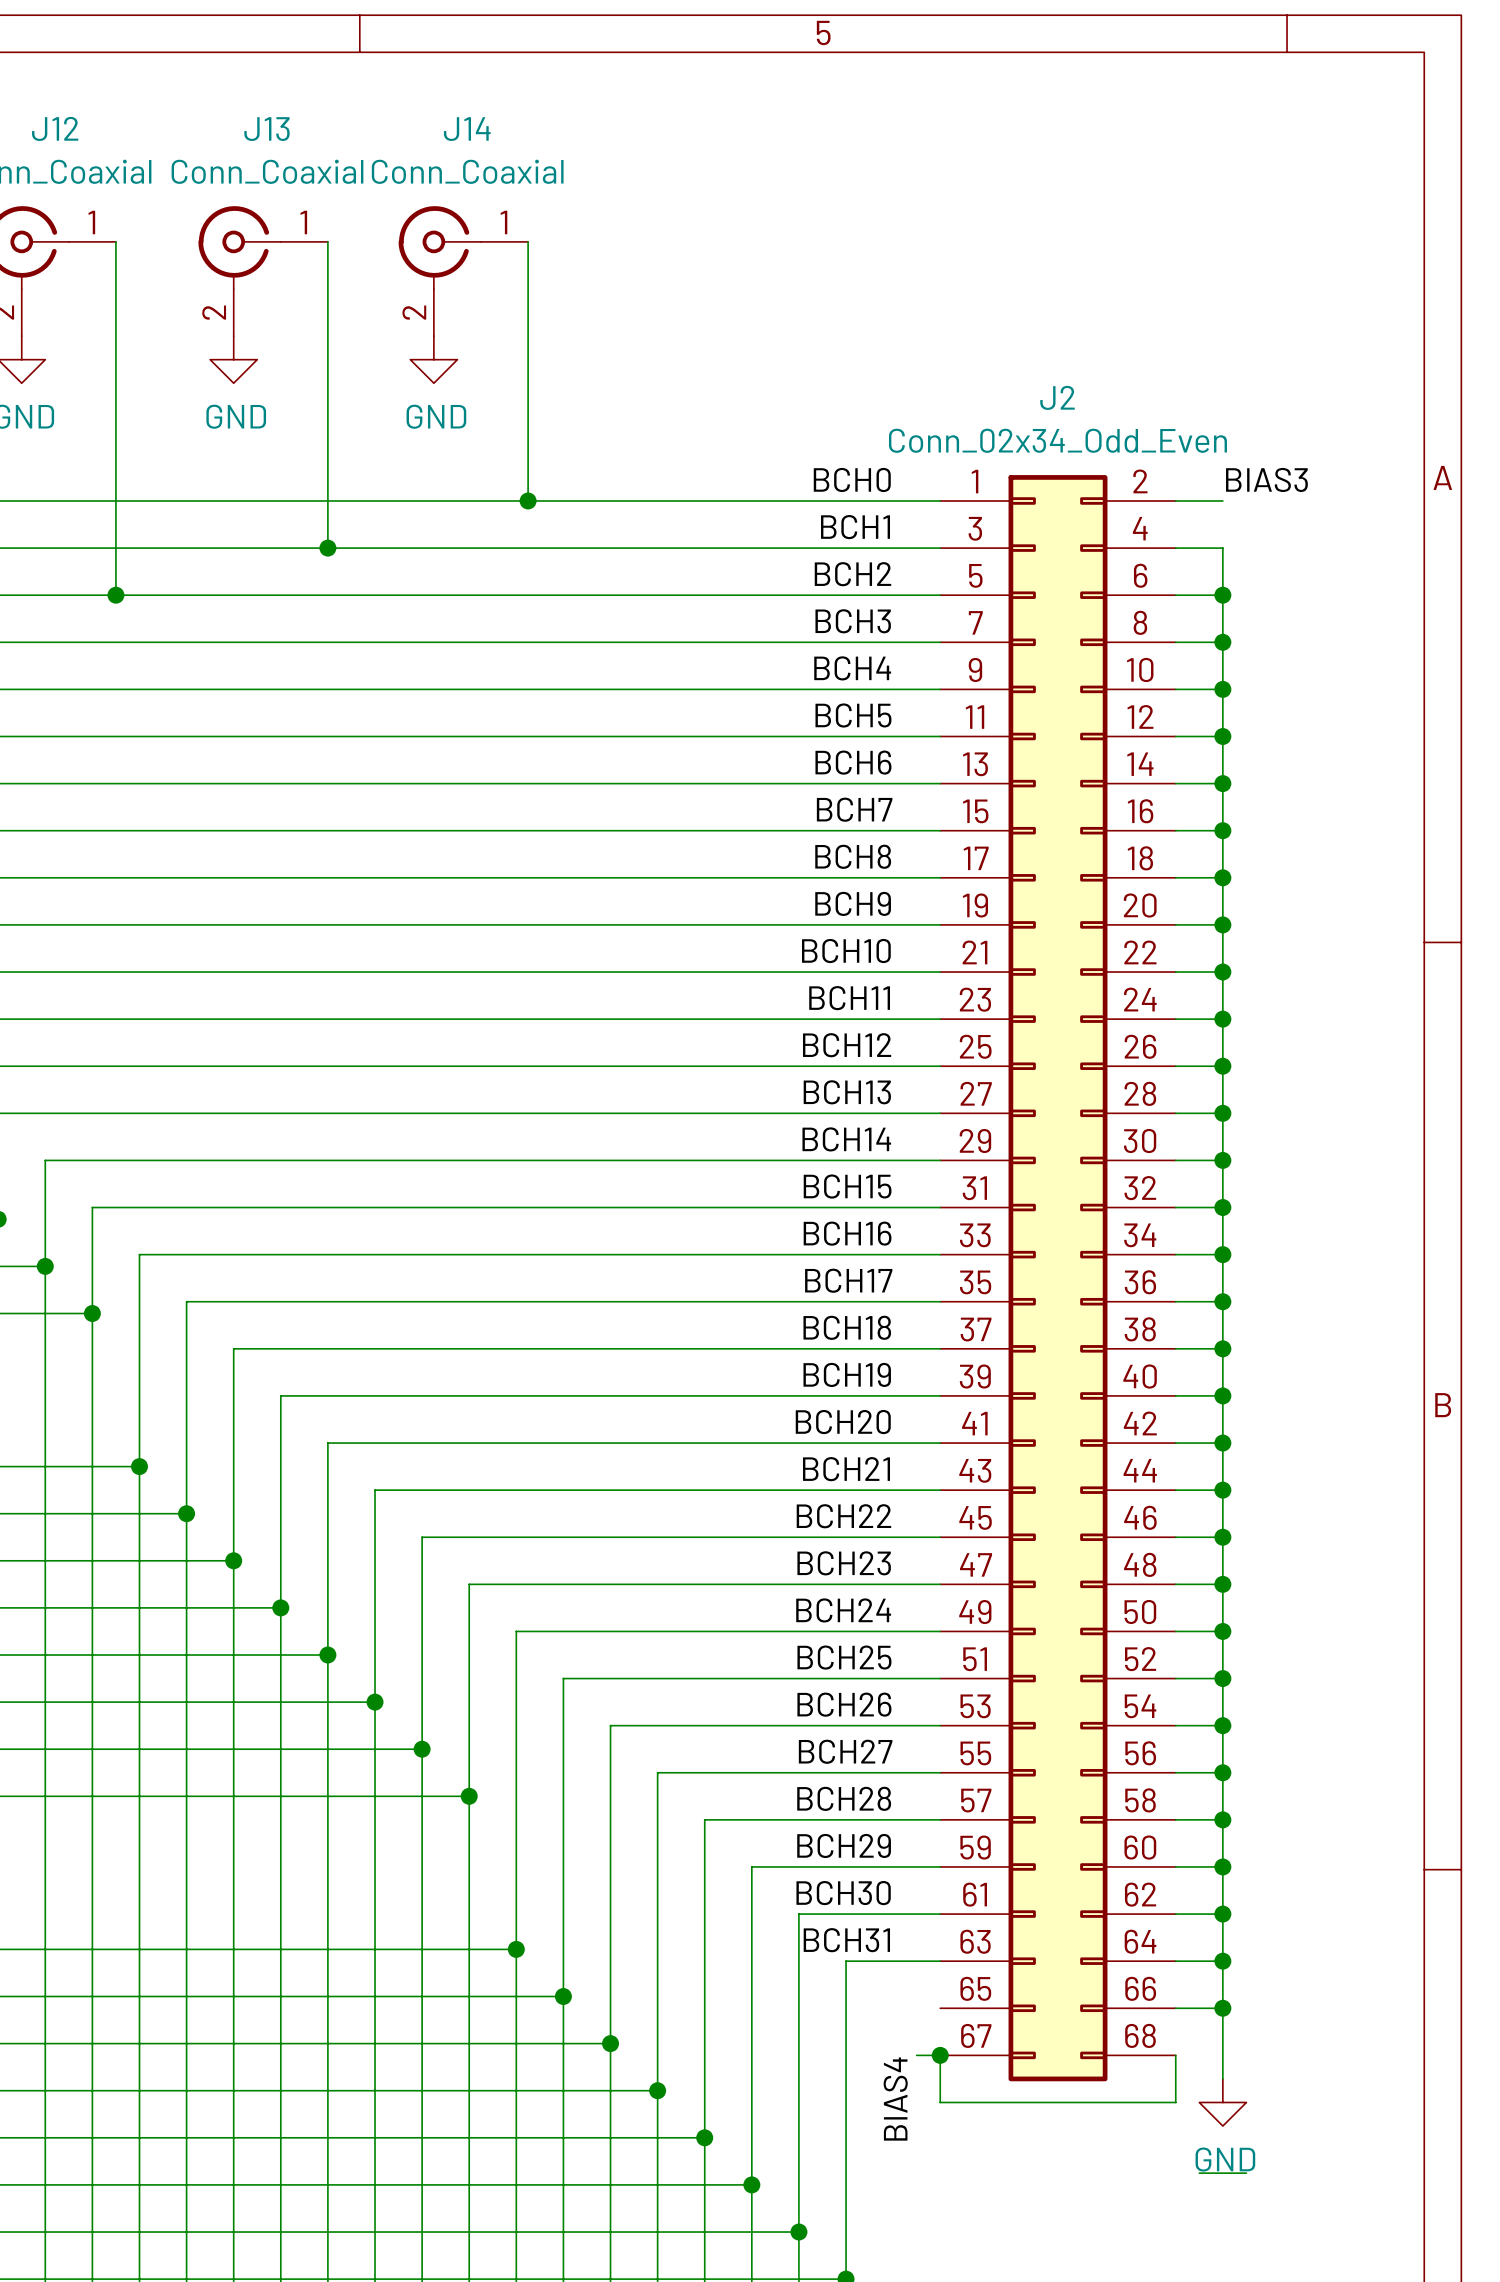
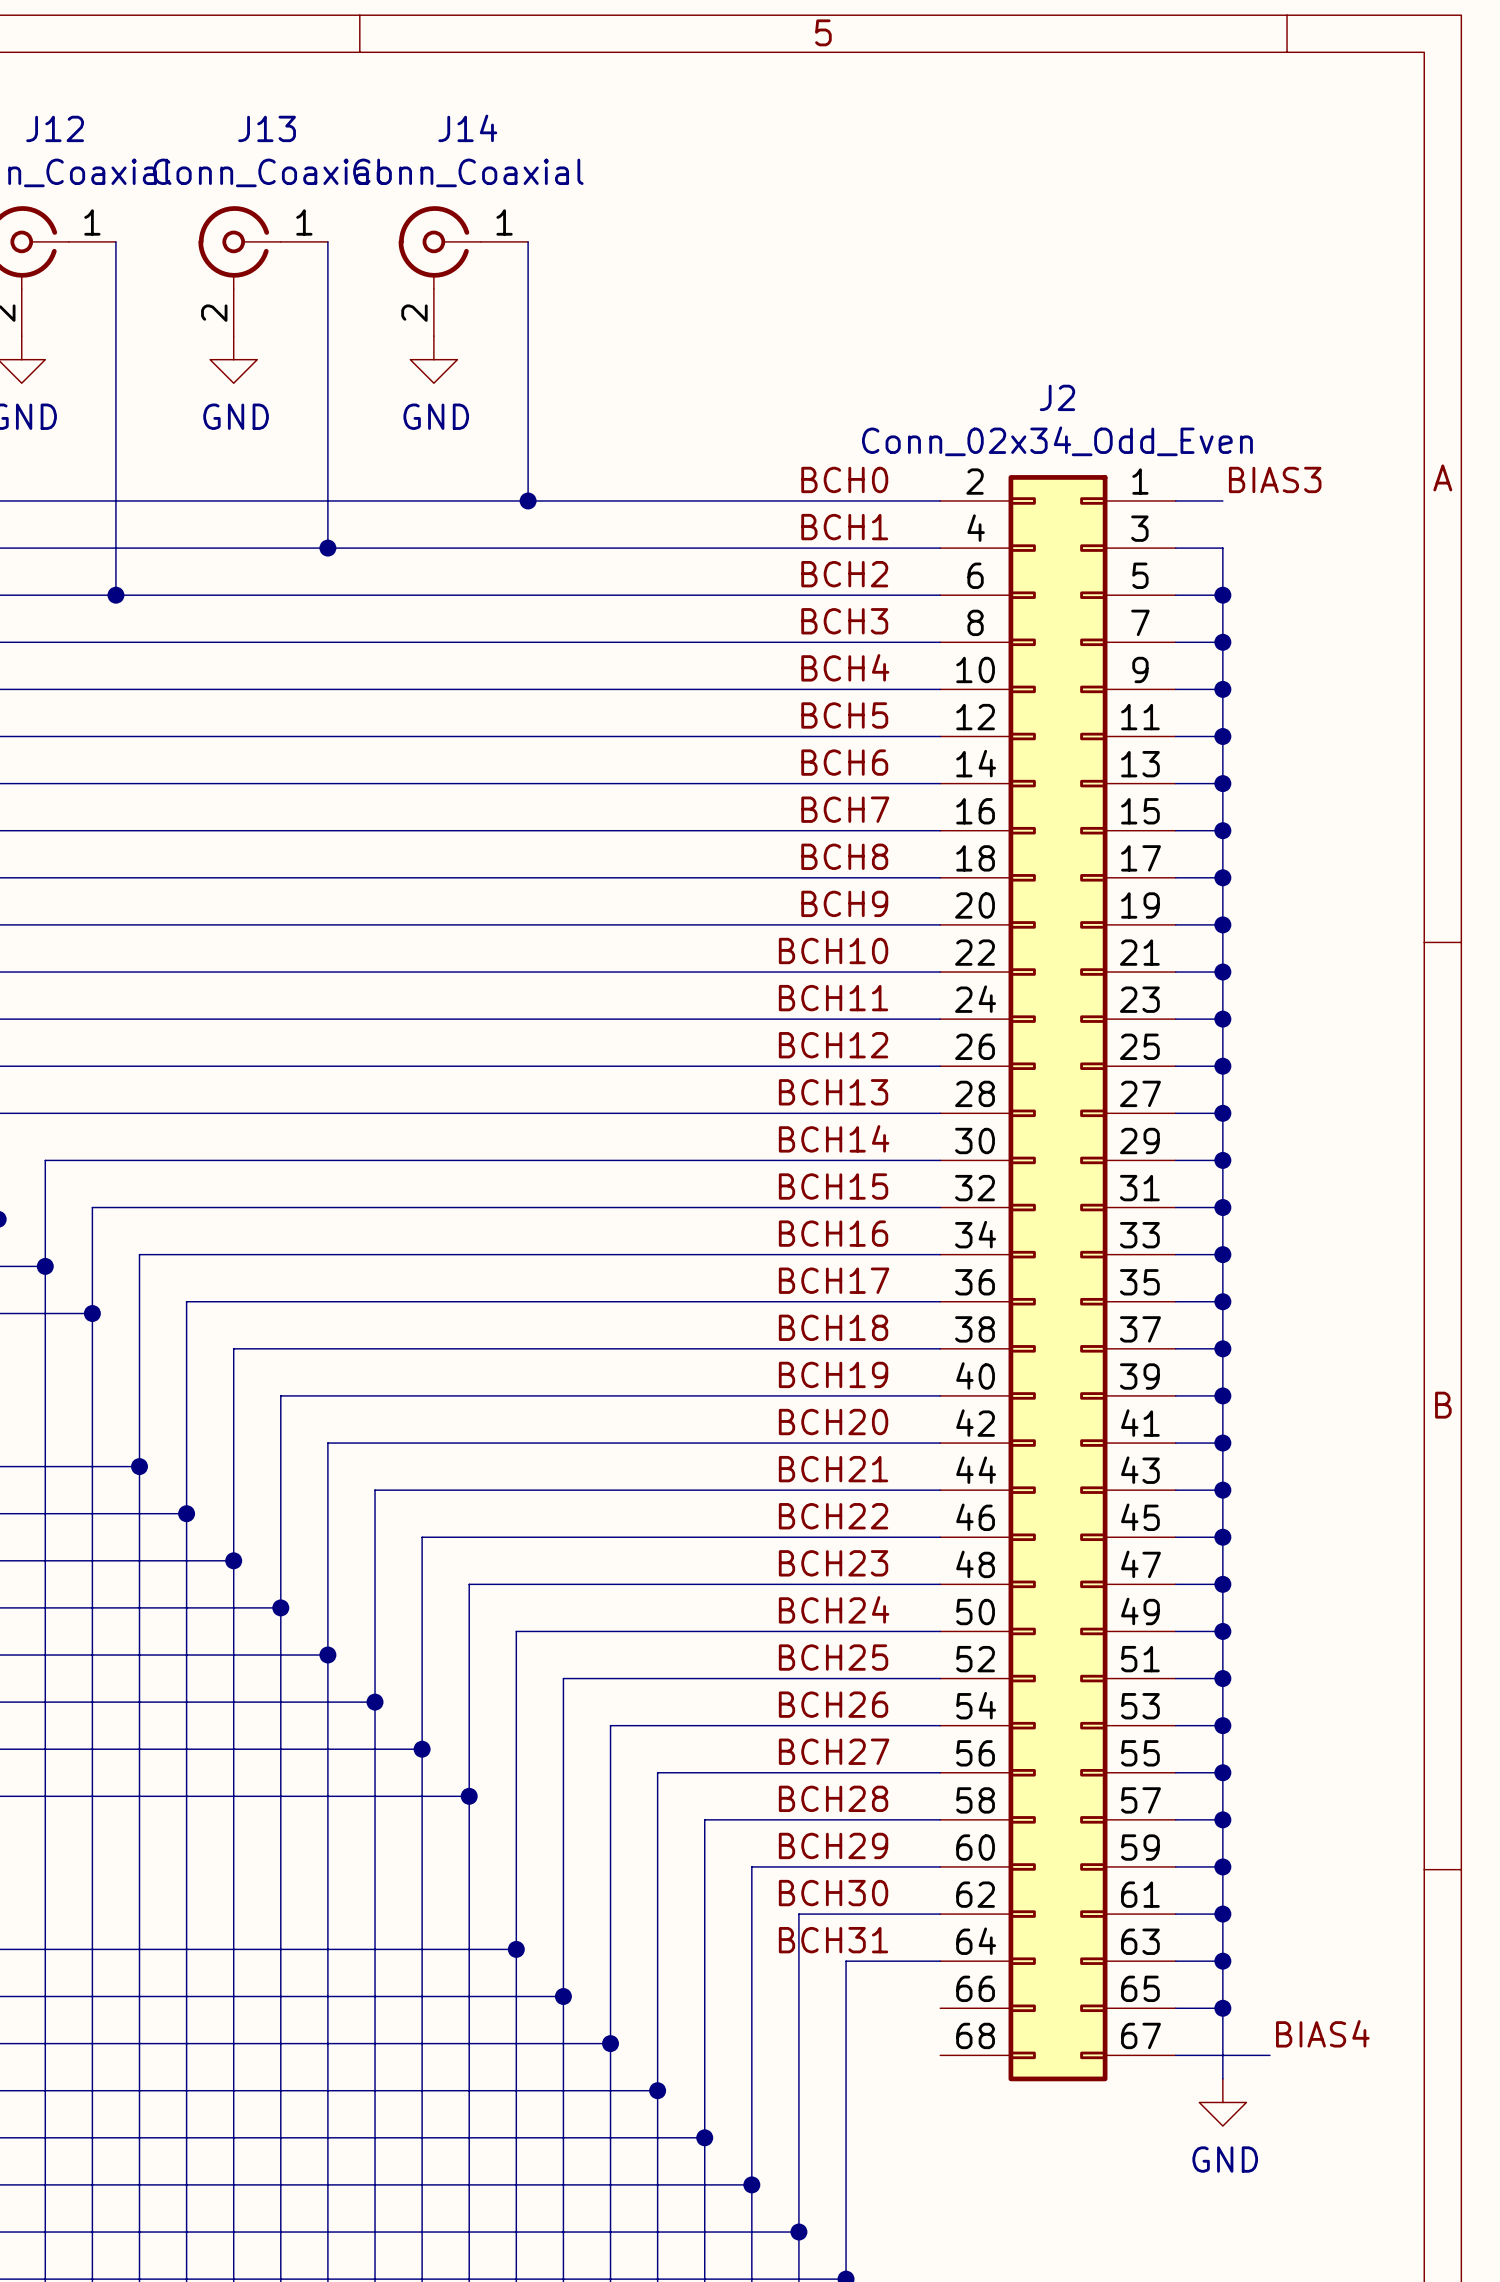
J2 flip: as is (1058, 1278) -> left-right (1058, 1278)
wire: (916, 2055) (940, 2055) (940, 2102) (1175, 2102) (1175, 2055) -> (1269, 2055) (1175, 2055)
junction: (940, 2055) -> none
label rotation: 0° (895, 2099) -> 90° clockwise (1322, 2033)
label position: BIAS4 (895, 2099) -> BIAS4 (1322, 2033)
wire: (1199, 2173) (1246, 2173) -> none

